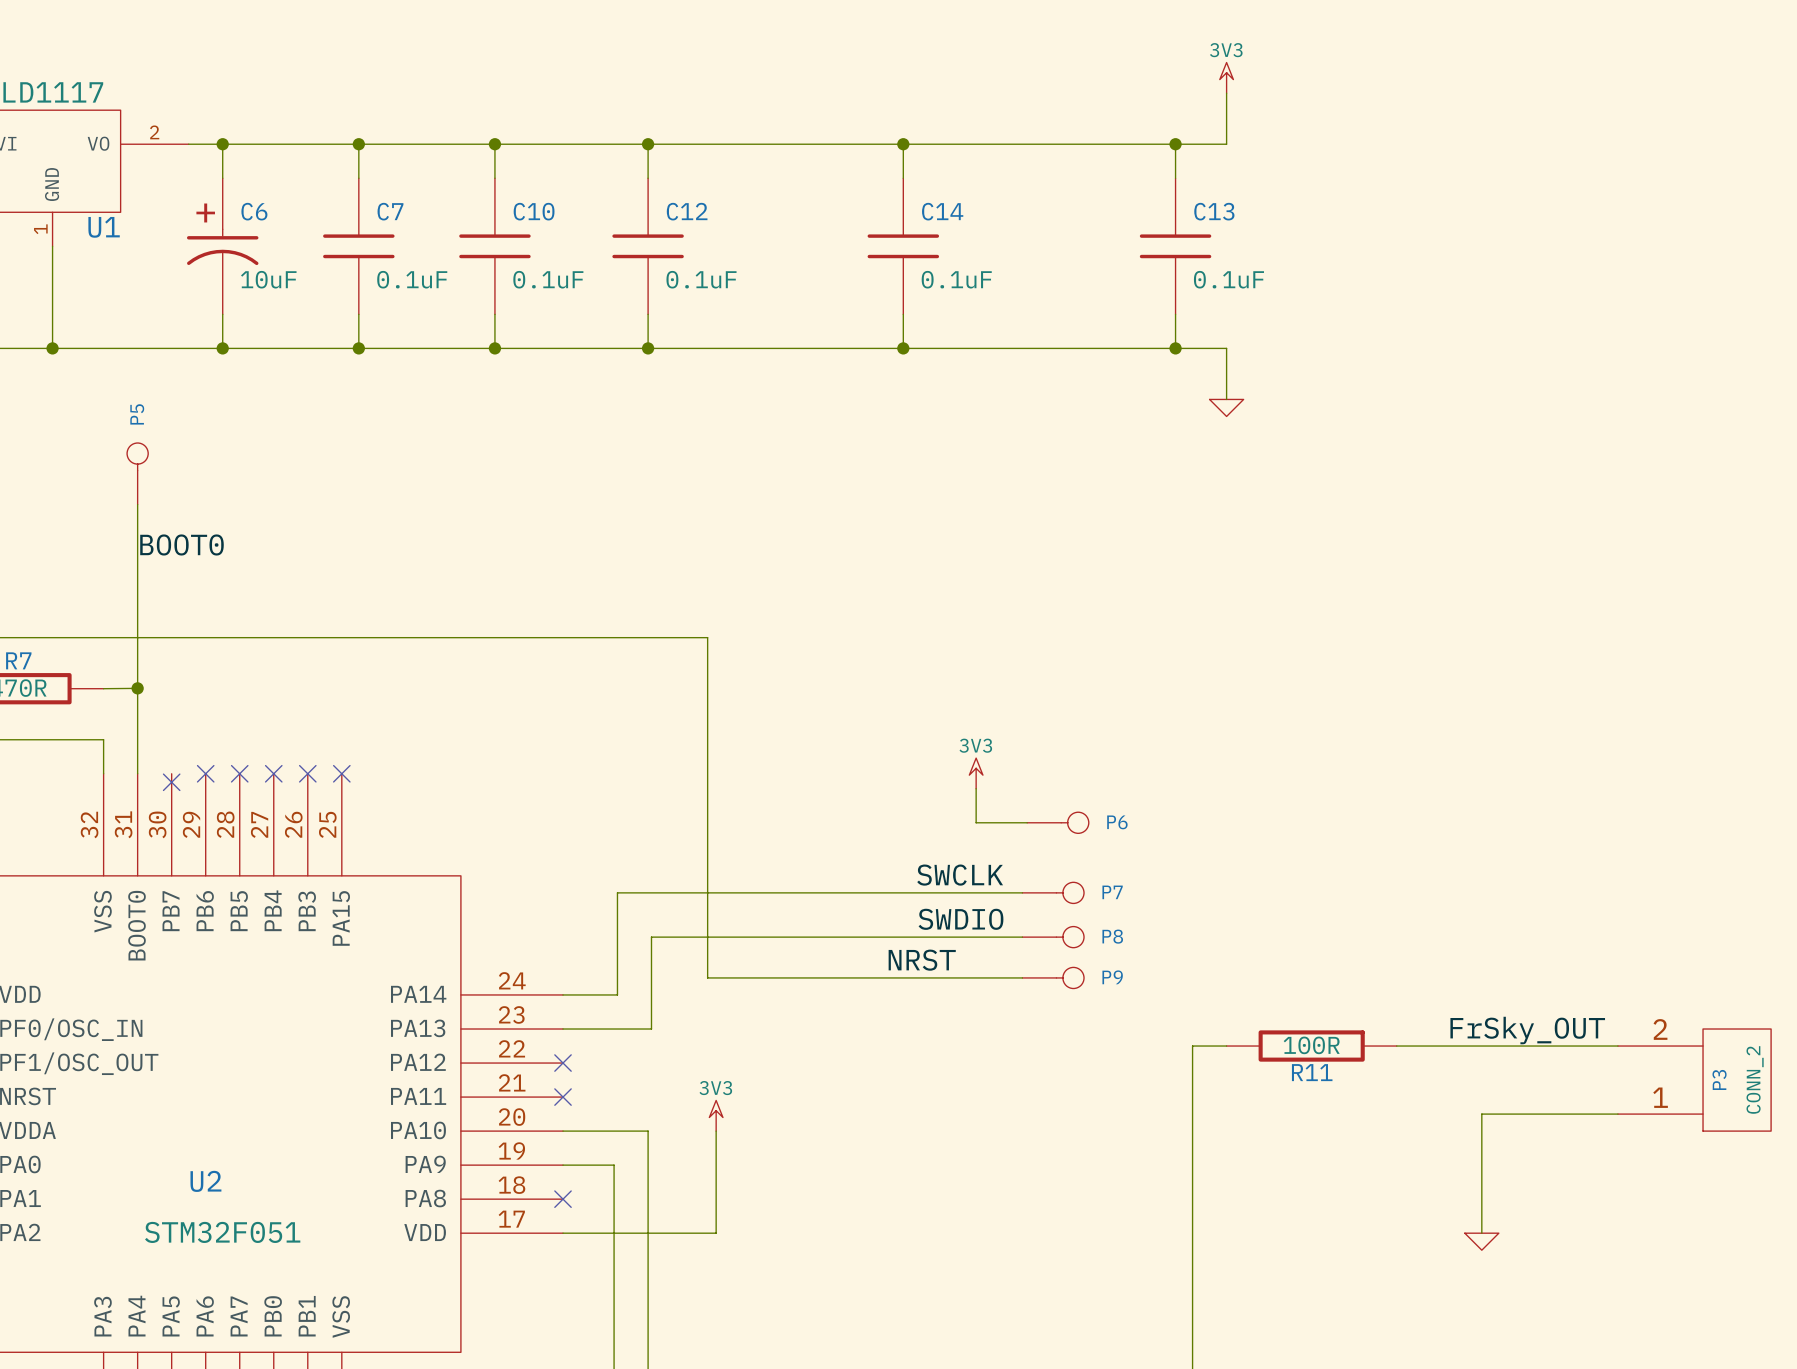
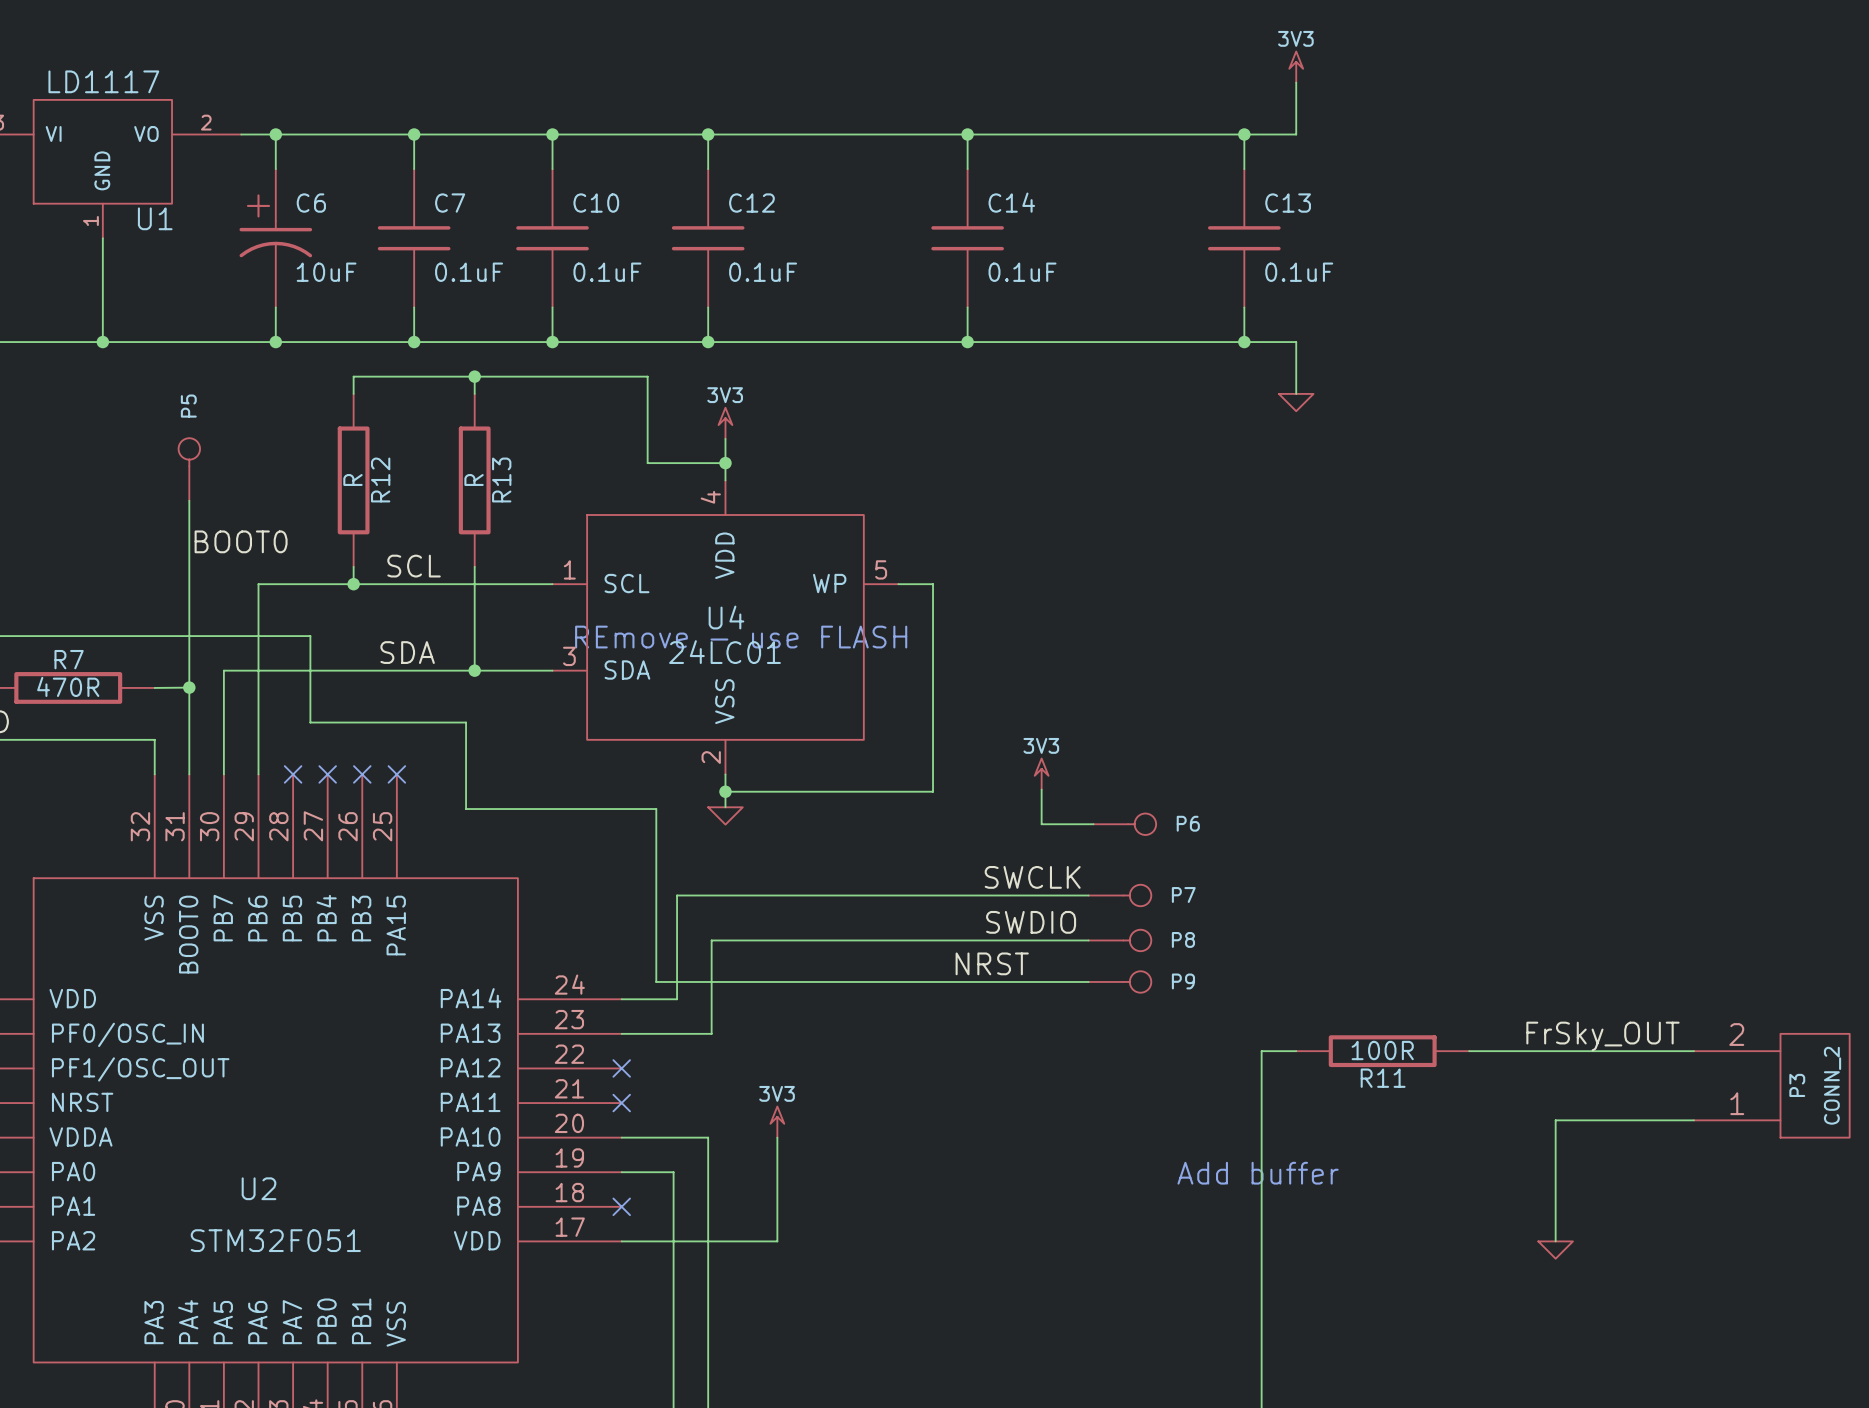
wire: none -> (474, 376) (474, 393)
junction: none -> (474, 376)
wire: none -> (353, 393) (353, 376) (647, 376) (647, 463) (725, 463)
power symbol: none -> 3V3 (725, 423)
wire: none -> (725, 438) (725, 480)
junction: none -> (725, 463)
R12: none -> R (353, 480)
R13: none -> R (474, 480)
label: none -> SCL (414, 566)
wire: none -> (353, 566) (353, 584)
wire: none -> (474, 566) (474, 670)
junction: none -> (353, 584)
wire: none -> (552, 584) (258, 584) (258, 774)
wire: none -> (898, 584) (933, 584) (933, 791) (725, 791)
U4: none -> 24LC01 (725, 627)
wire: (256, 637) (707, 637) (707, 977) -> (310, 636) (310, 722) (466, 722) (466, 809) (656, 809) (656, 981) (768, 981)
text: none -> REmove - use FLASH (741, 637)
label: none -> SDA (407, 652)
junction: none -> (474, 670)
wire: none -> (552, 670) (223, 670) (223, 774)
no-connect mark: (205, 773) -> none
wire: none -> (725, 774) (725, 807)
no-connect mark: (171, 782) -> none
junction: none -> (725, 791)
power symbol: none -> (725, 815)
text: none -> Add buffer (1258, 1173)

